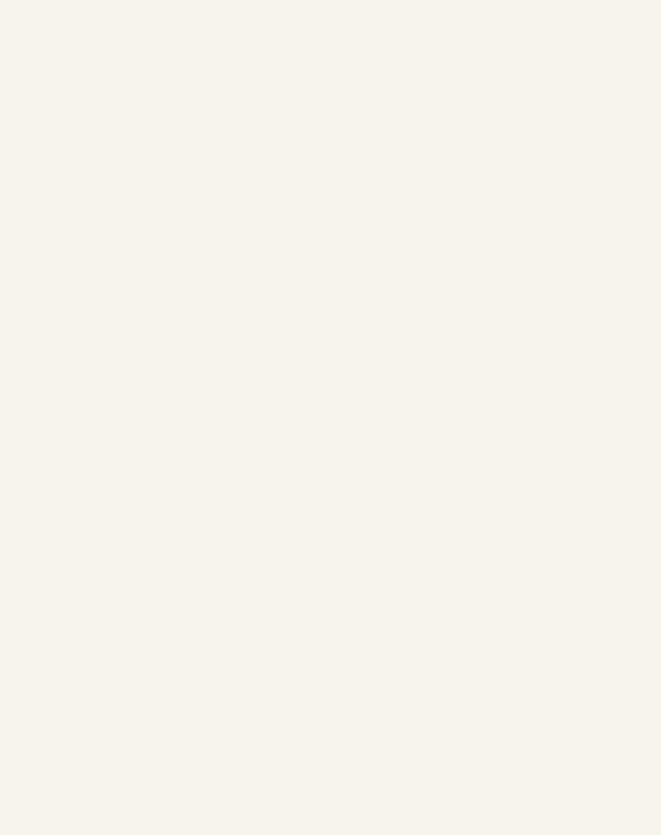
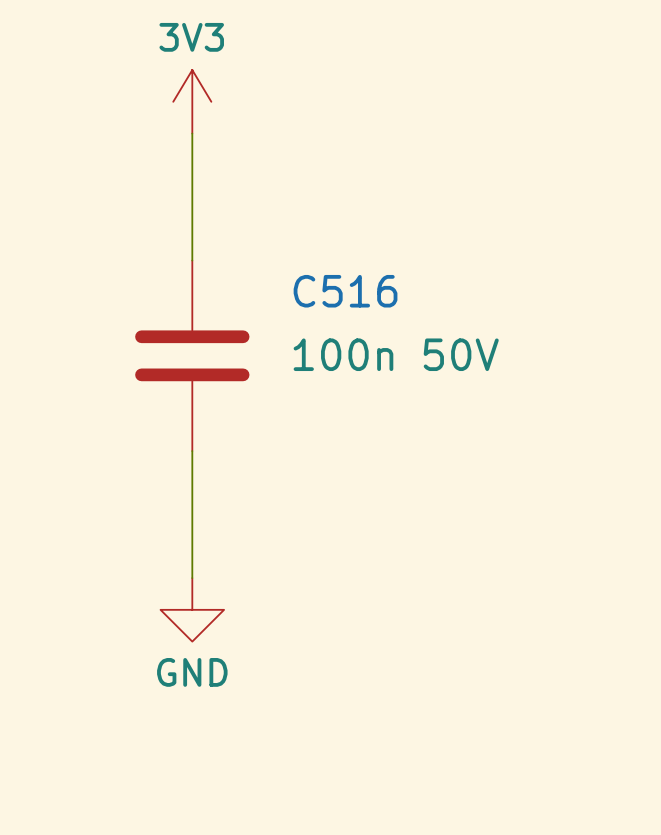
power symbol: none -> 3V3 (192, 101)
wire: none -> (192, 133) (192, 260)
C516: none -> 100n 50V (192, 355)
wire: none -> (192, 451) (192, 578)
power symbol: none -> GND (192, 609)

